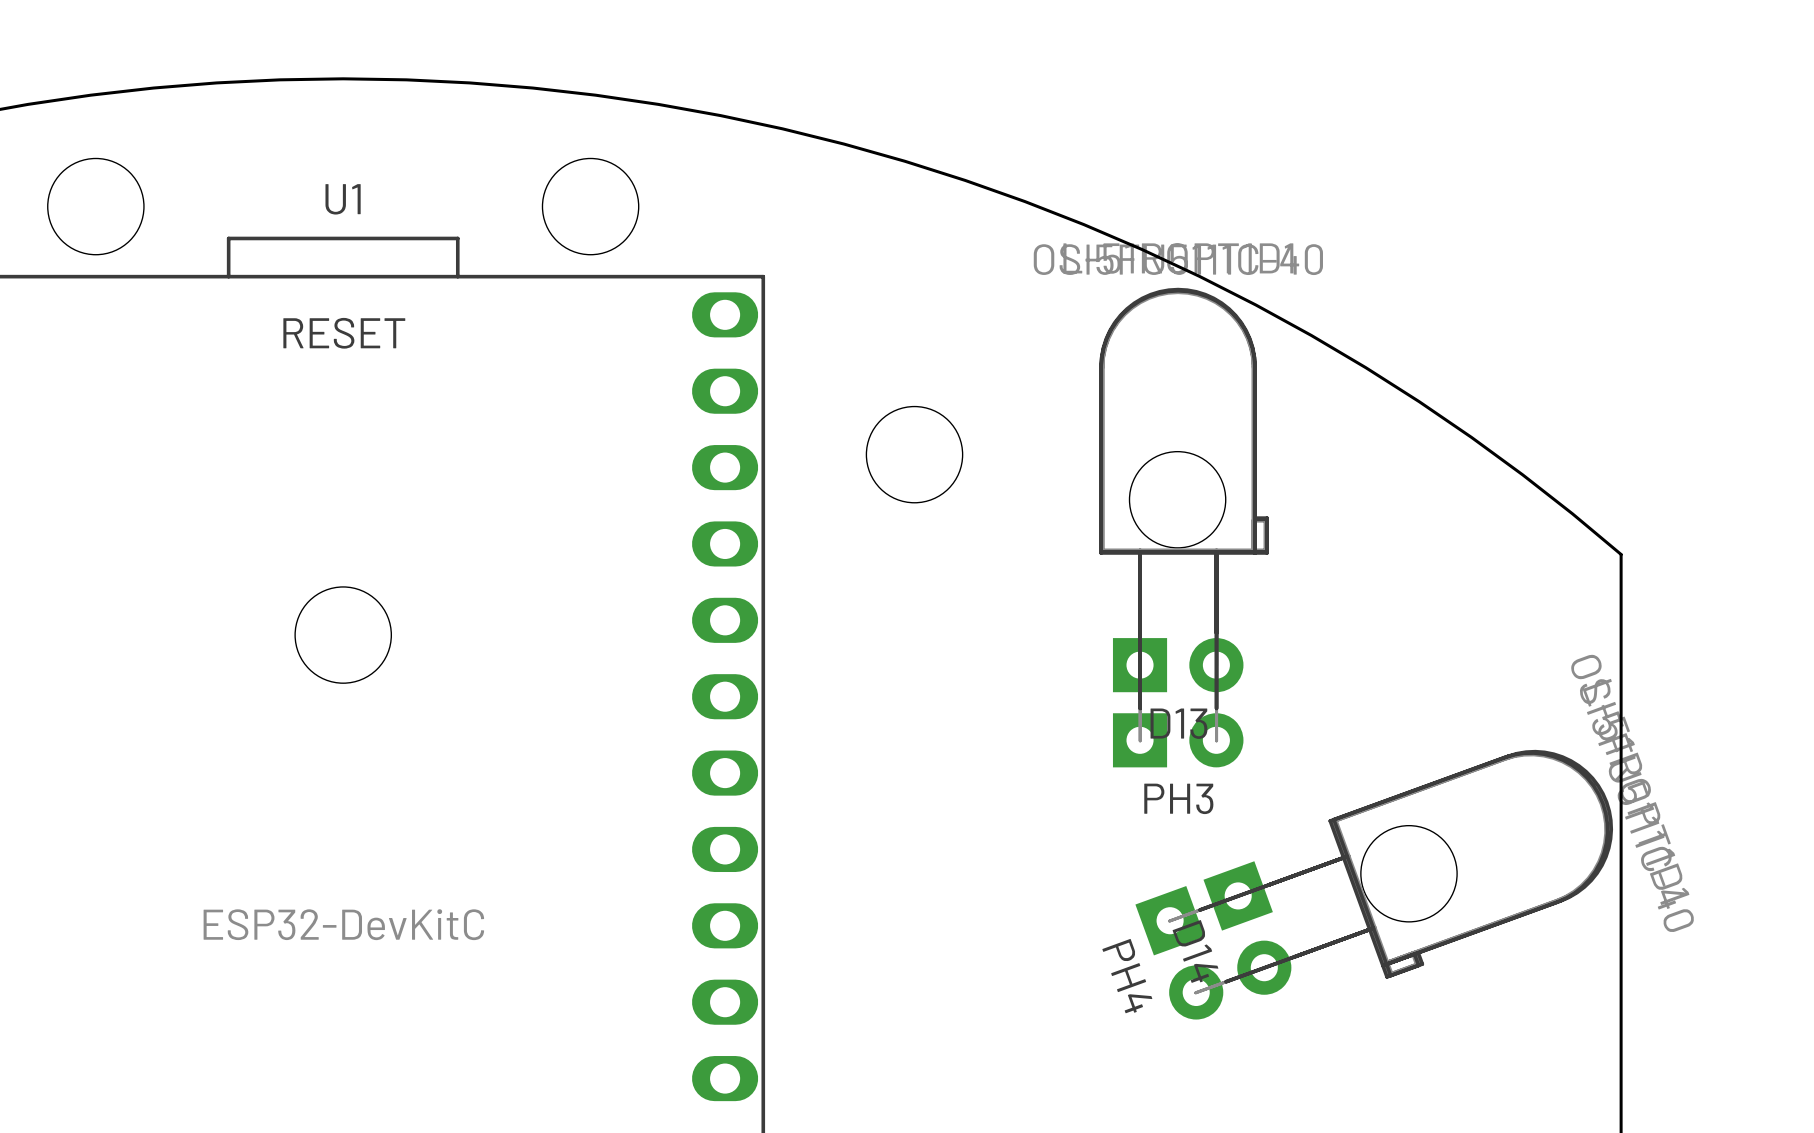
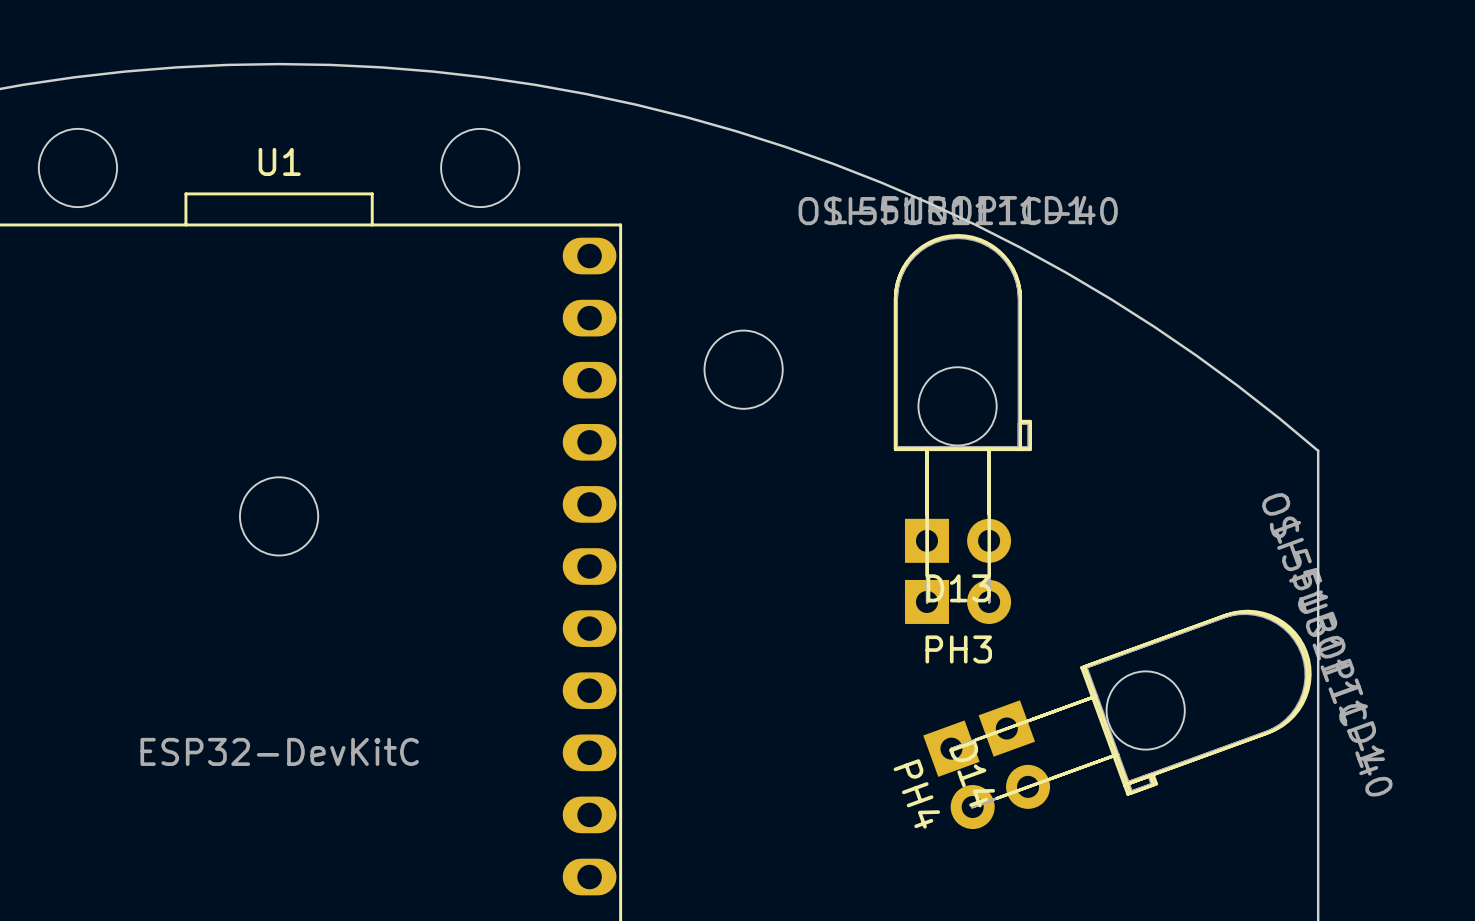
text: RESET (344, 333) -> none

